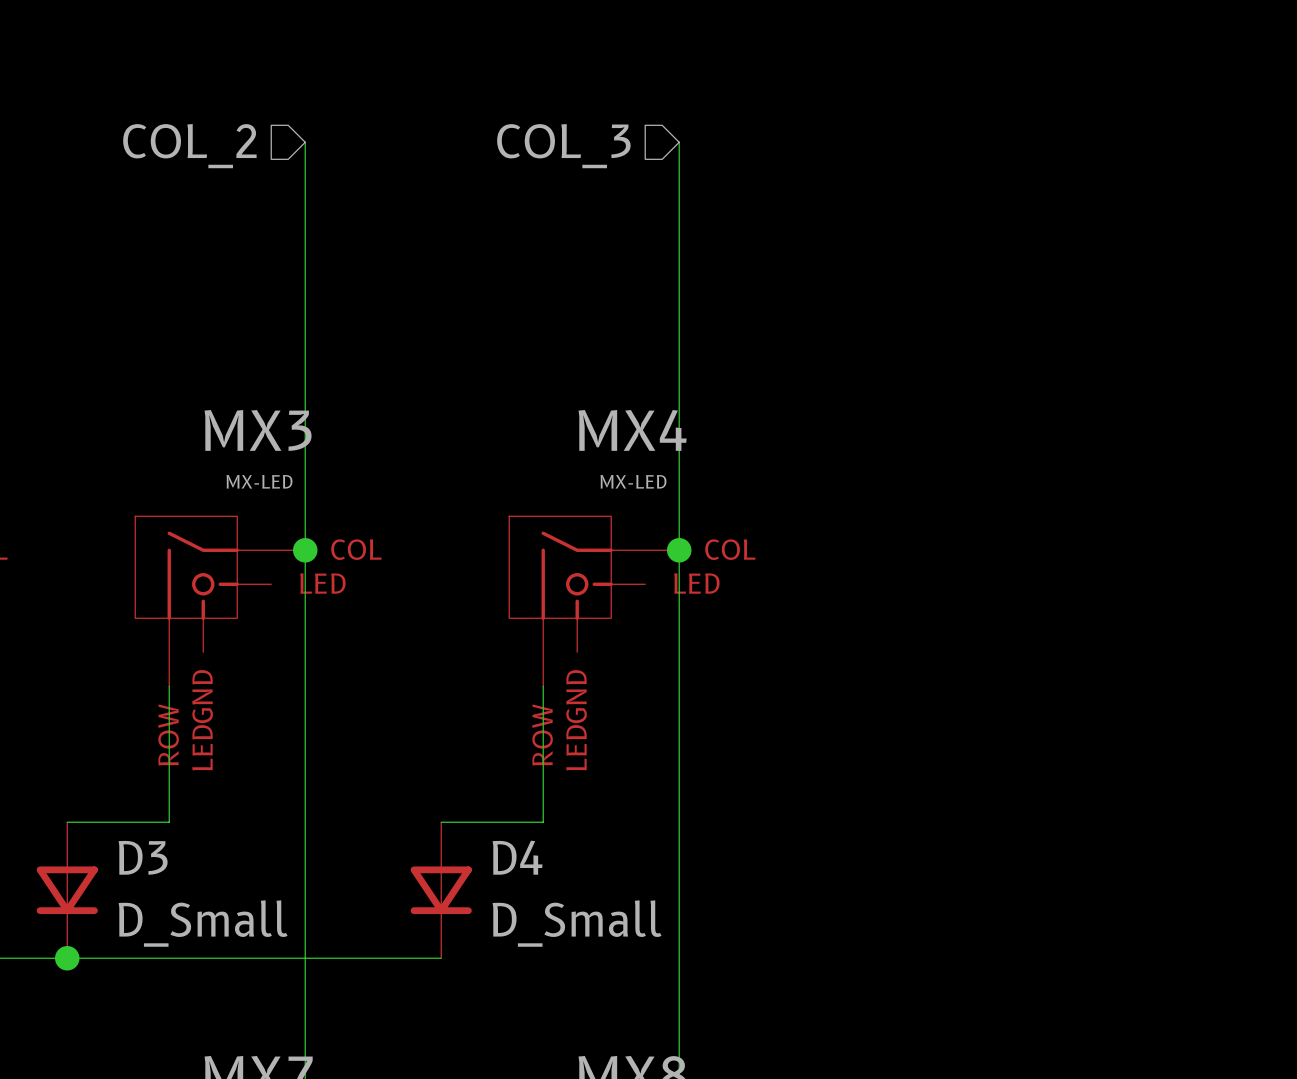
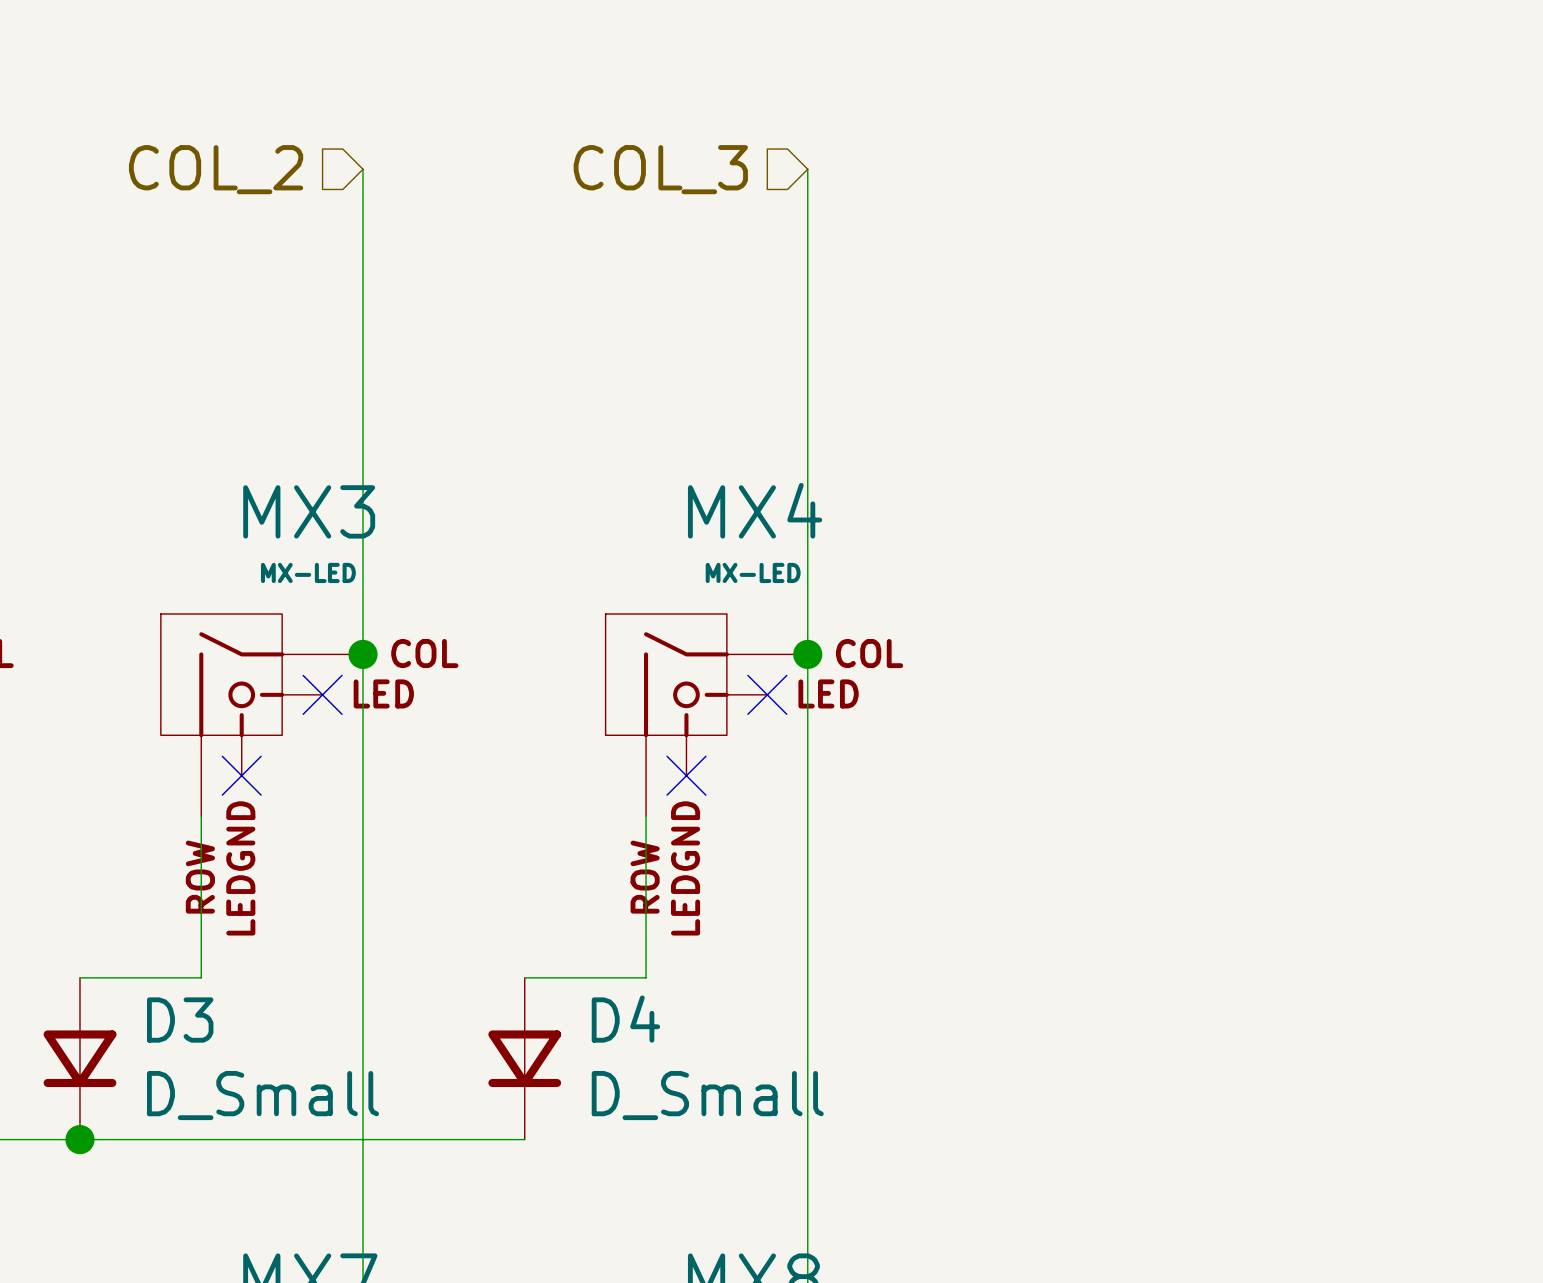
no-connect mark: none -> (322, 694)
no-connect mark: none -> (767, 694)
no-connect mark: none -> (241, 775)
no-connect mark: none -> (686, 775)

